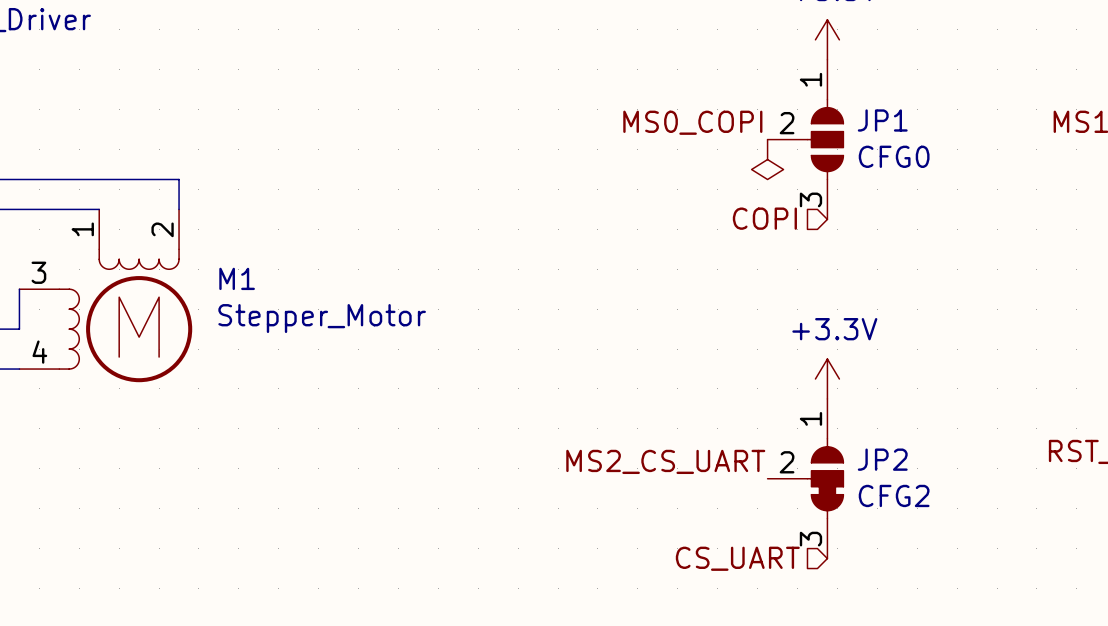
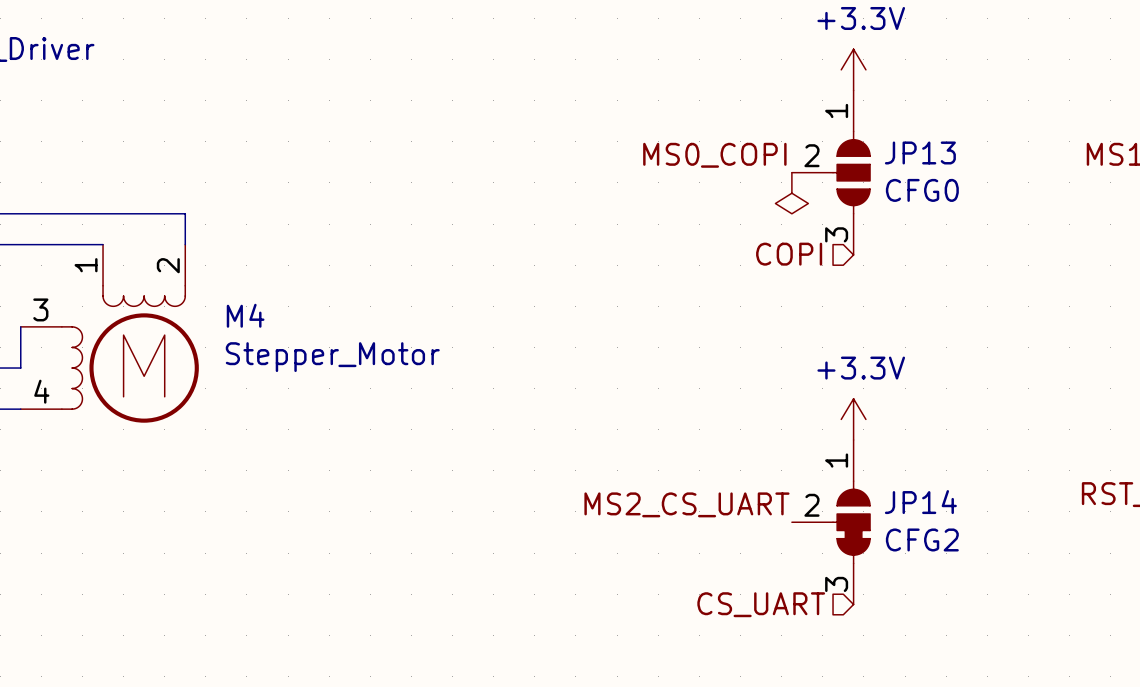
JP1 name: JP1 (882, 120) -> JP13 (920, 152)
M1 name: M1 (237, 278) -> M4 (245, 315)
JP2 name: JP2 (882, 459) -> JP14 (920, 502)

